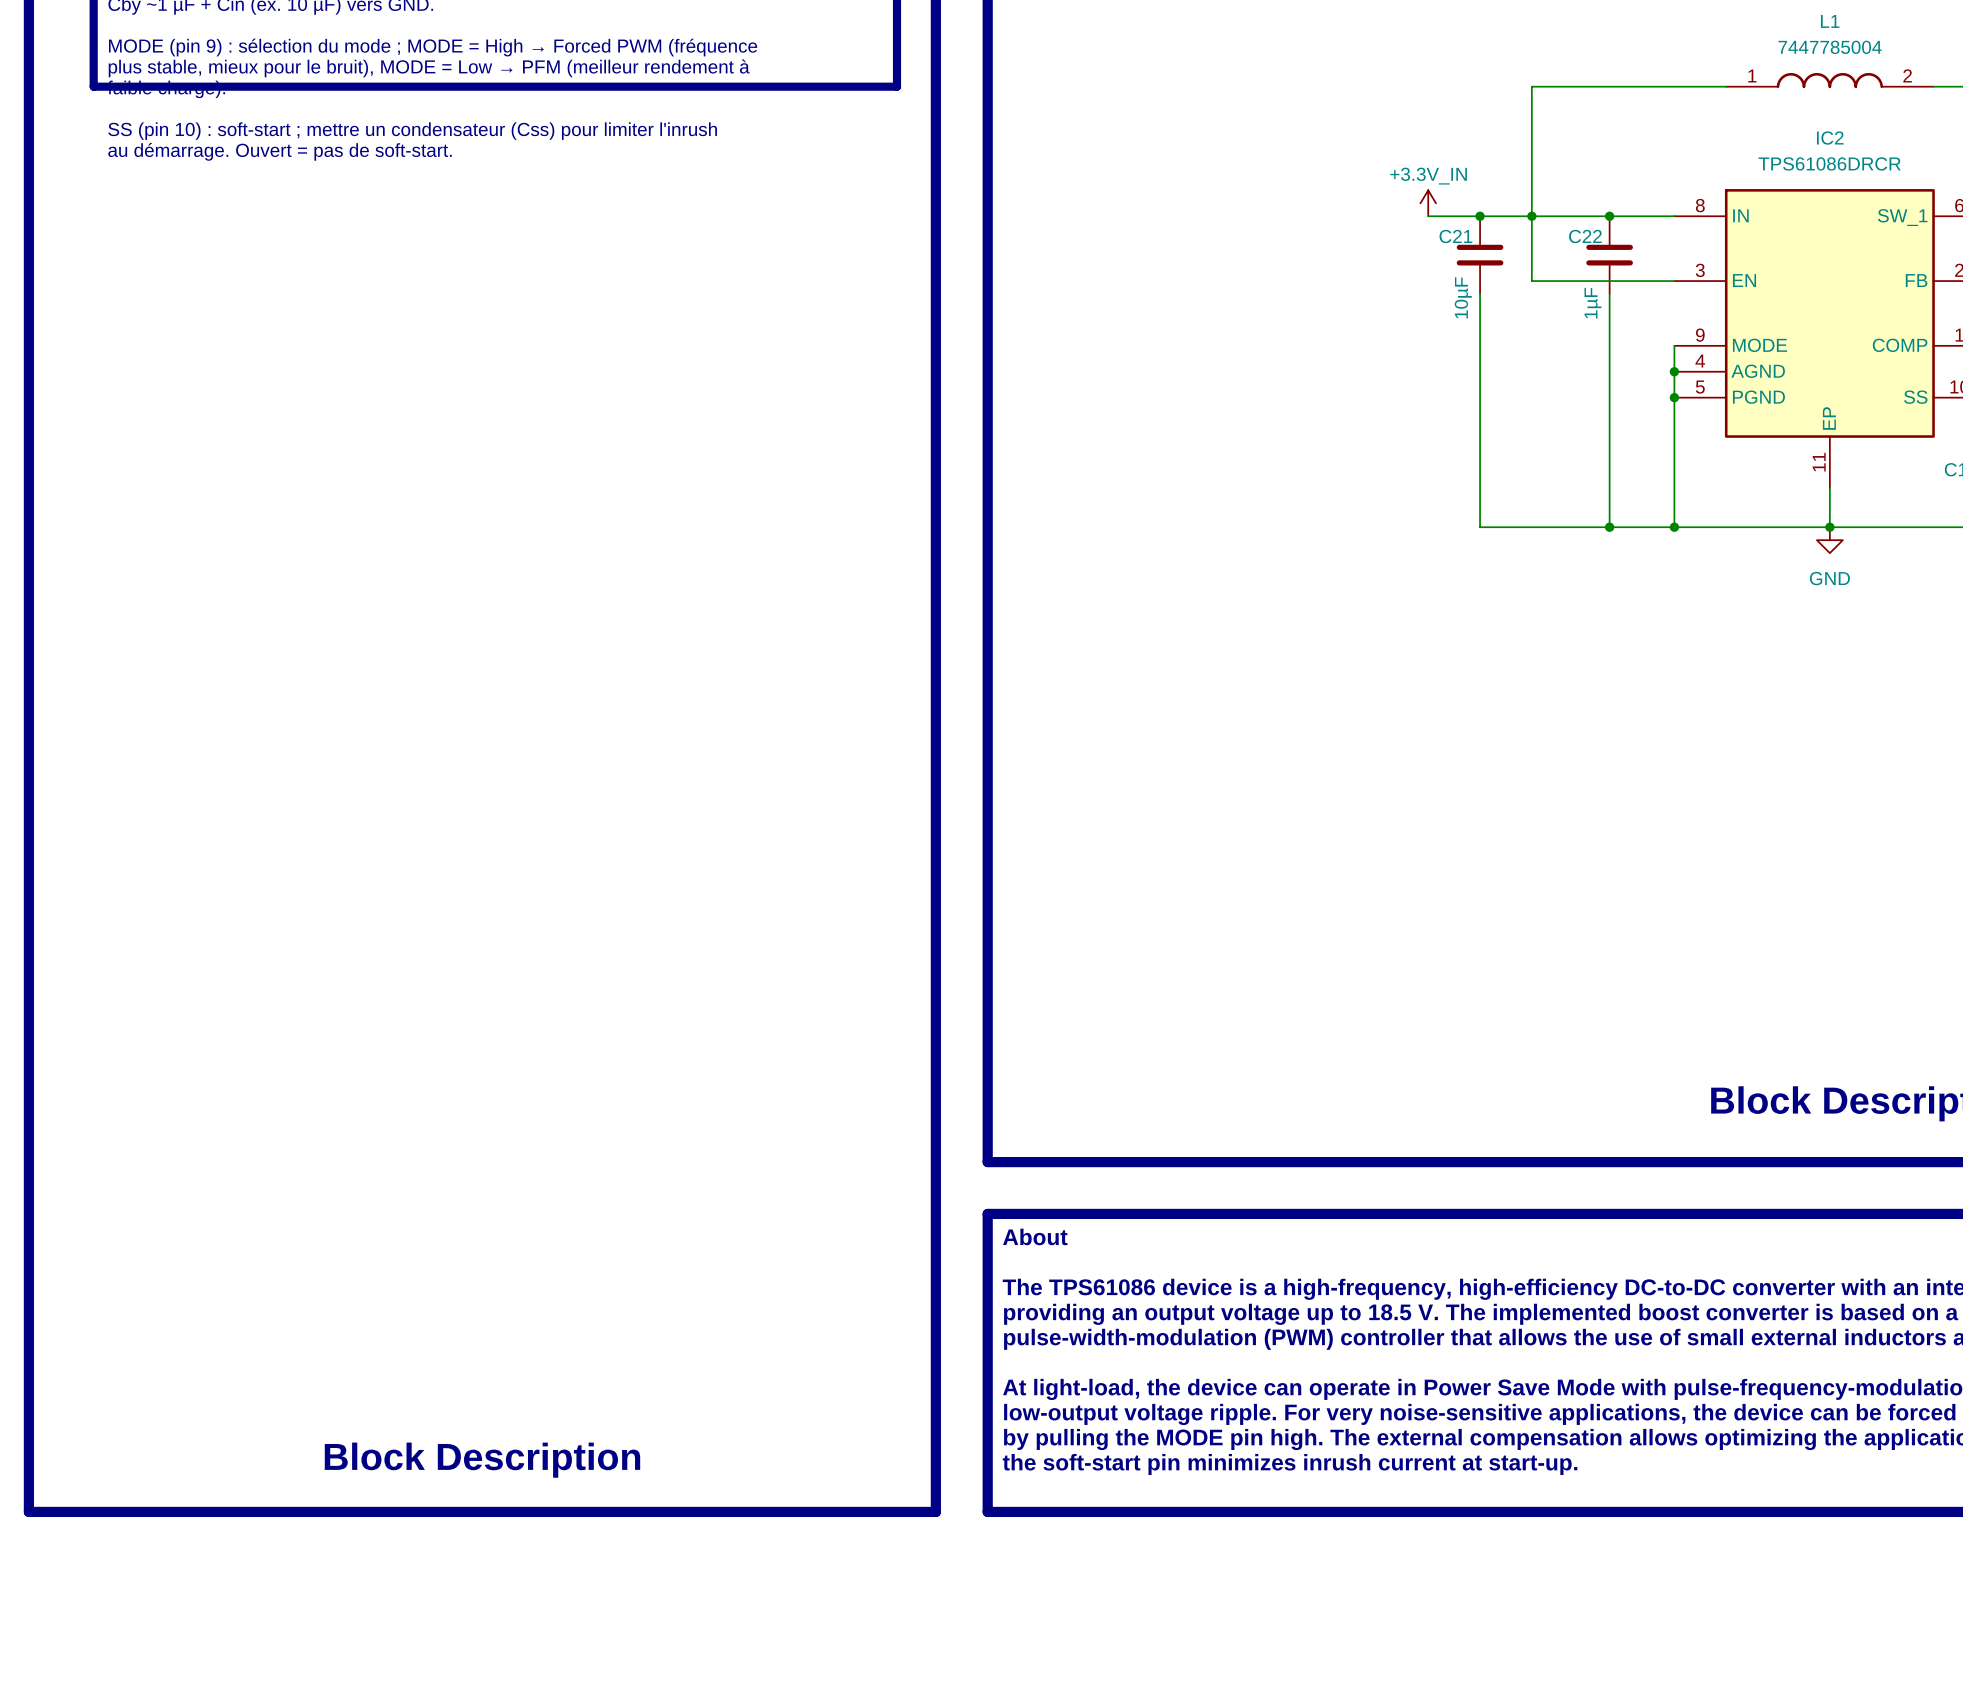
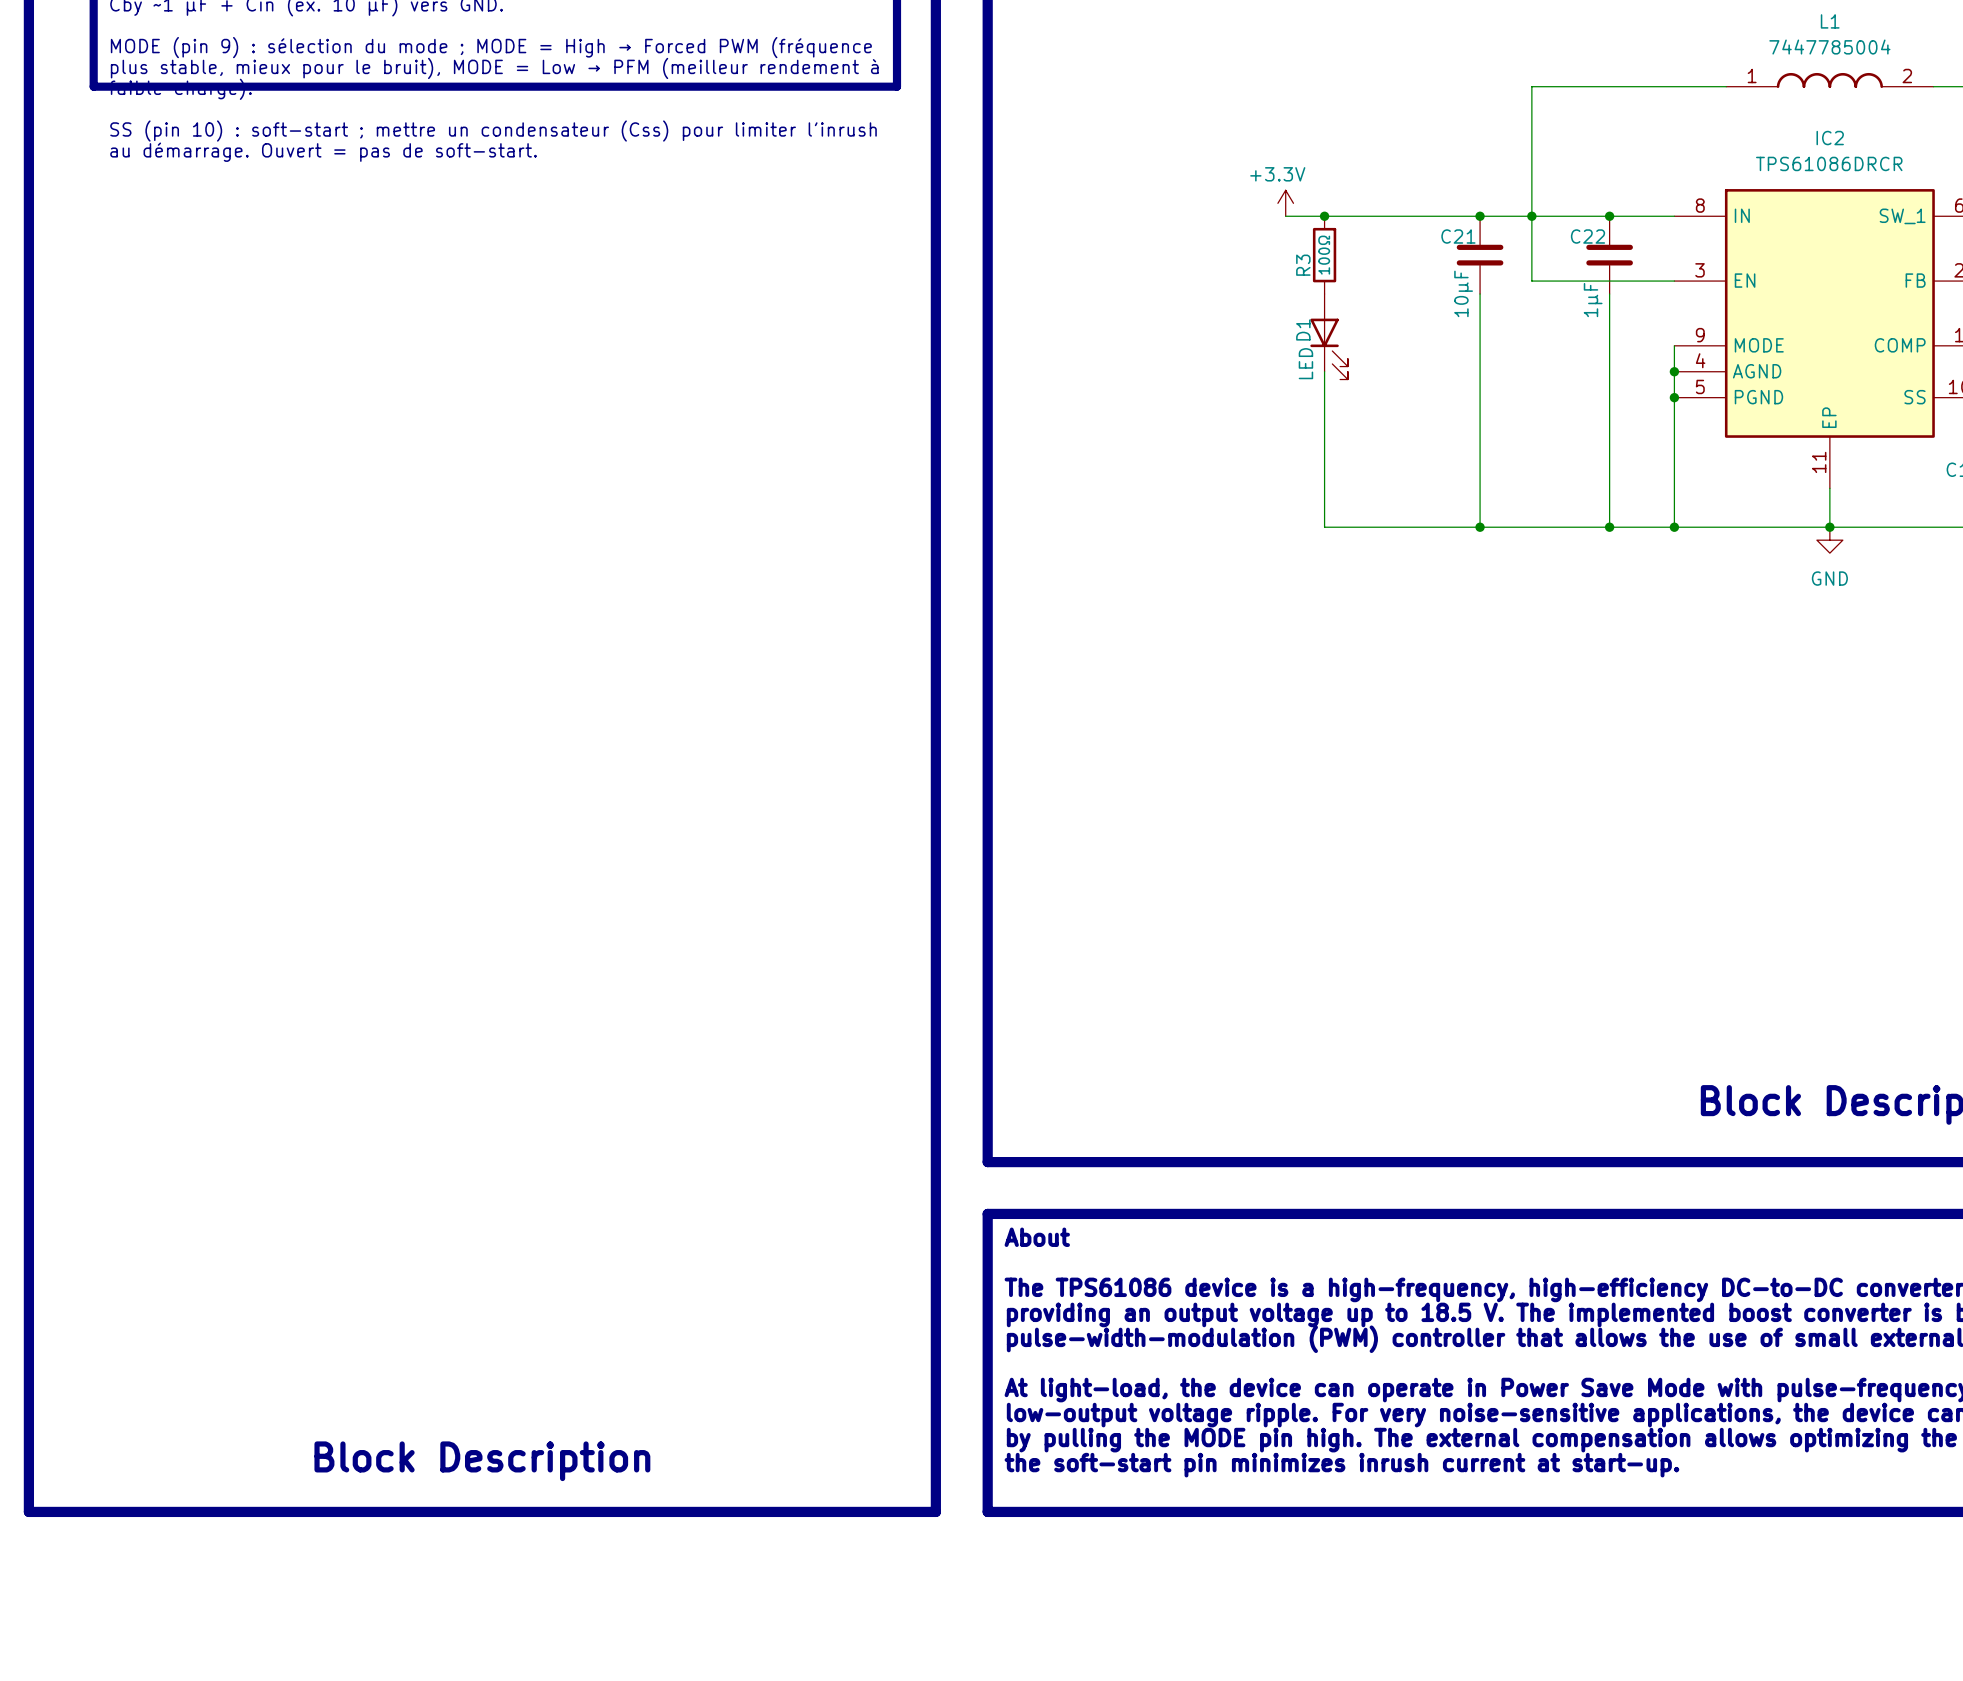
power symbol: none -> +3.3V (1285, 203)
power symbol: +3.3V_IN (1428, 203) -> none
wire: none -> (1285, 216) (1428, 216)
junction: none -> (1324, 216)
R3: none -> 100Ω (1324, 255)
D1: none -> LED (1329, 336)
wire: none -> (1324, 371) (1324, 527) (1480, 527)
junction: none -> (1480, 527)

